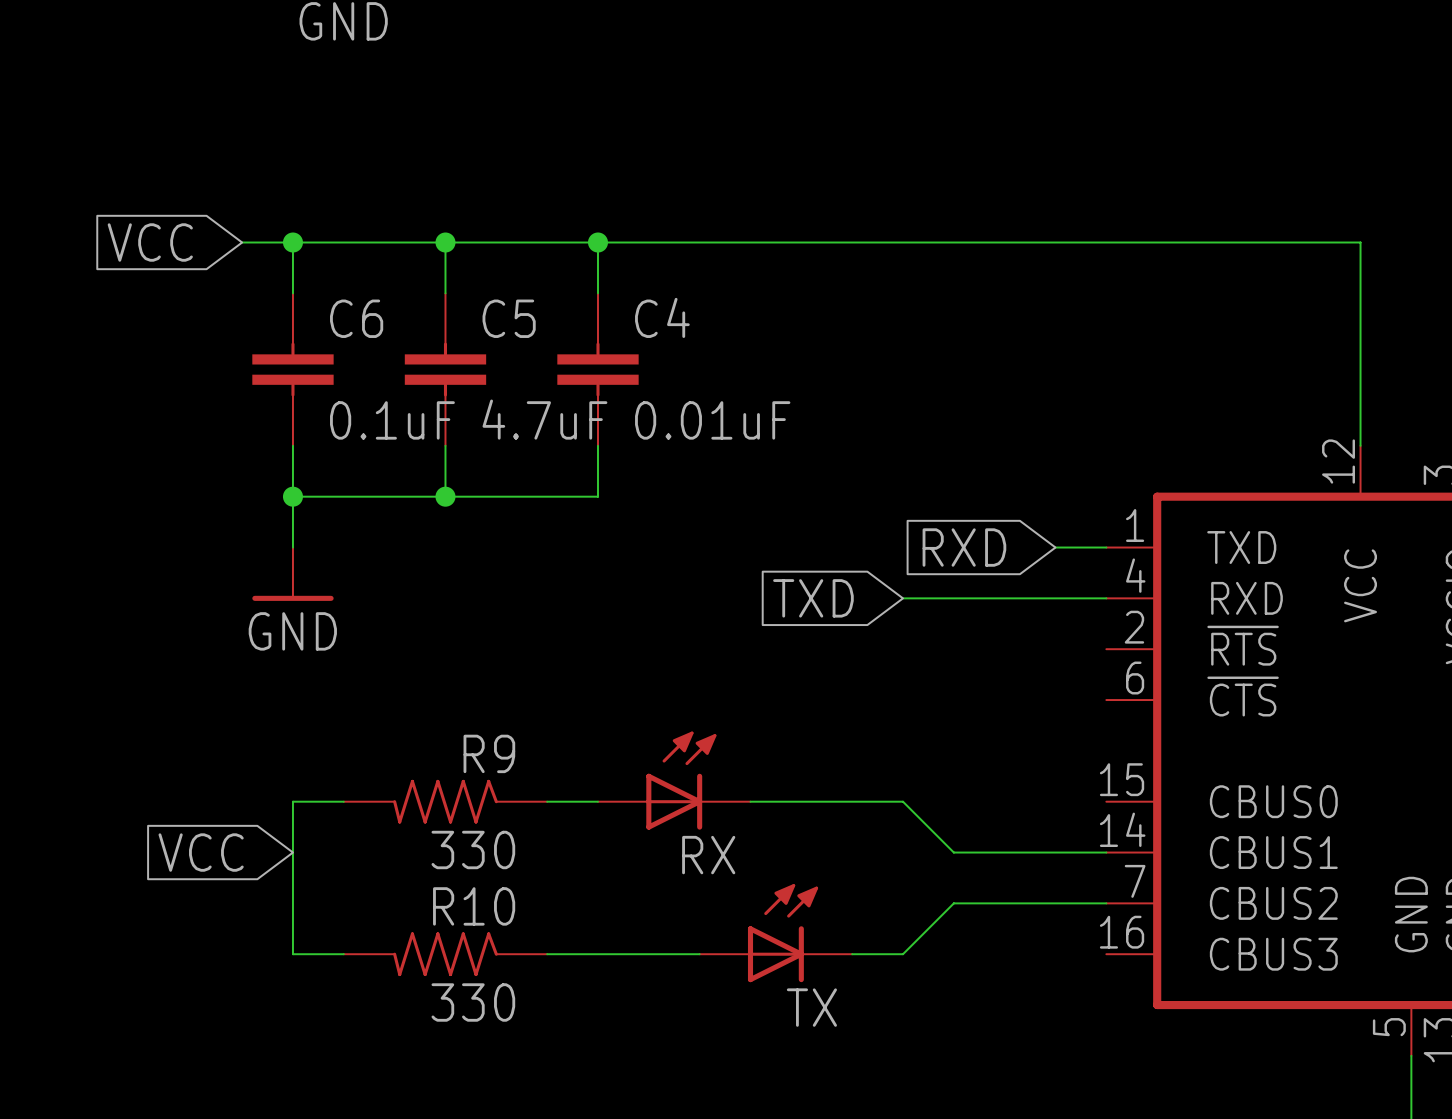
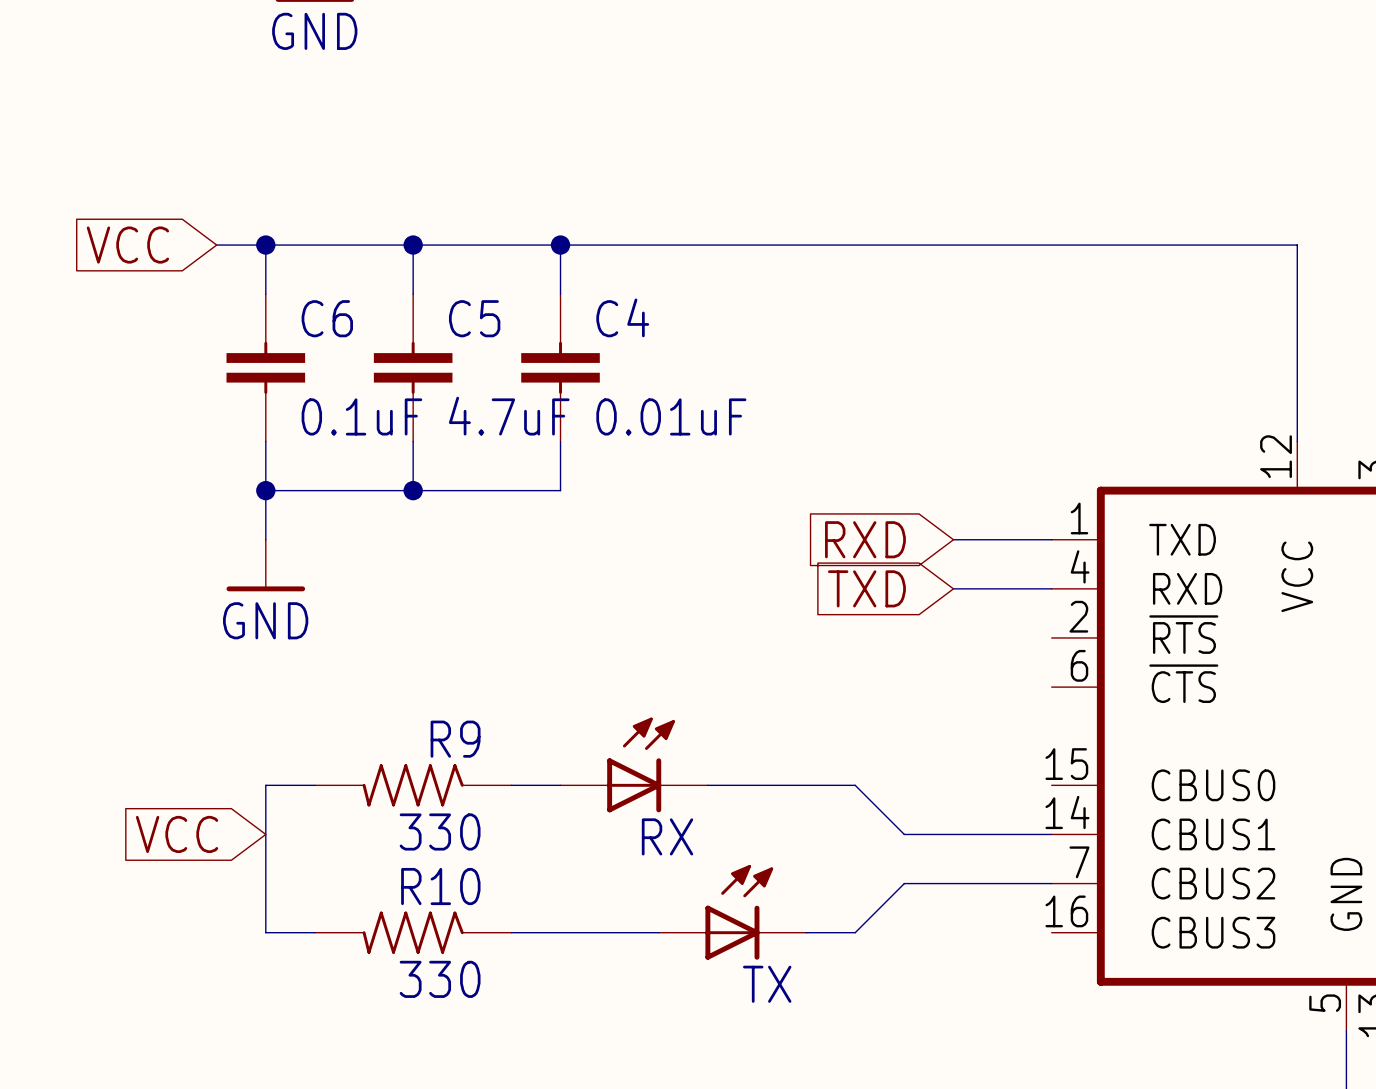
global label position: RXD (964, 547) -> RXD (865, 539)
wire: none -> (953, 539) (1002, 539)
global label position: TXD (813, 598) -> TXD (866, 588)
wire: (903, 598) (1004, 598) -> none

